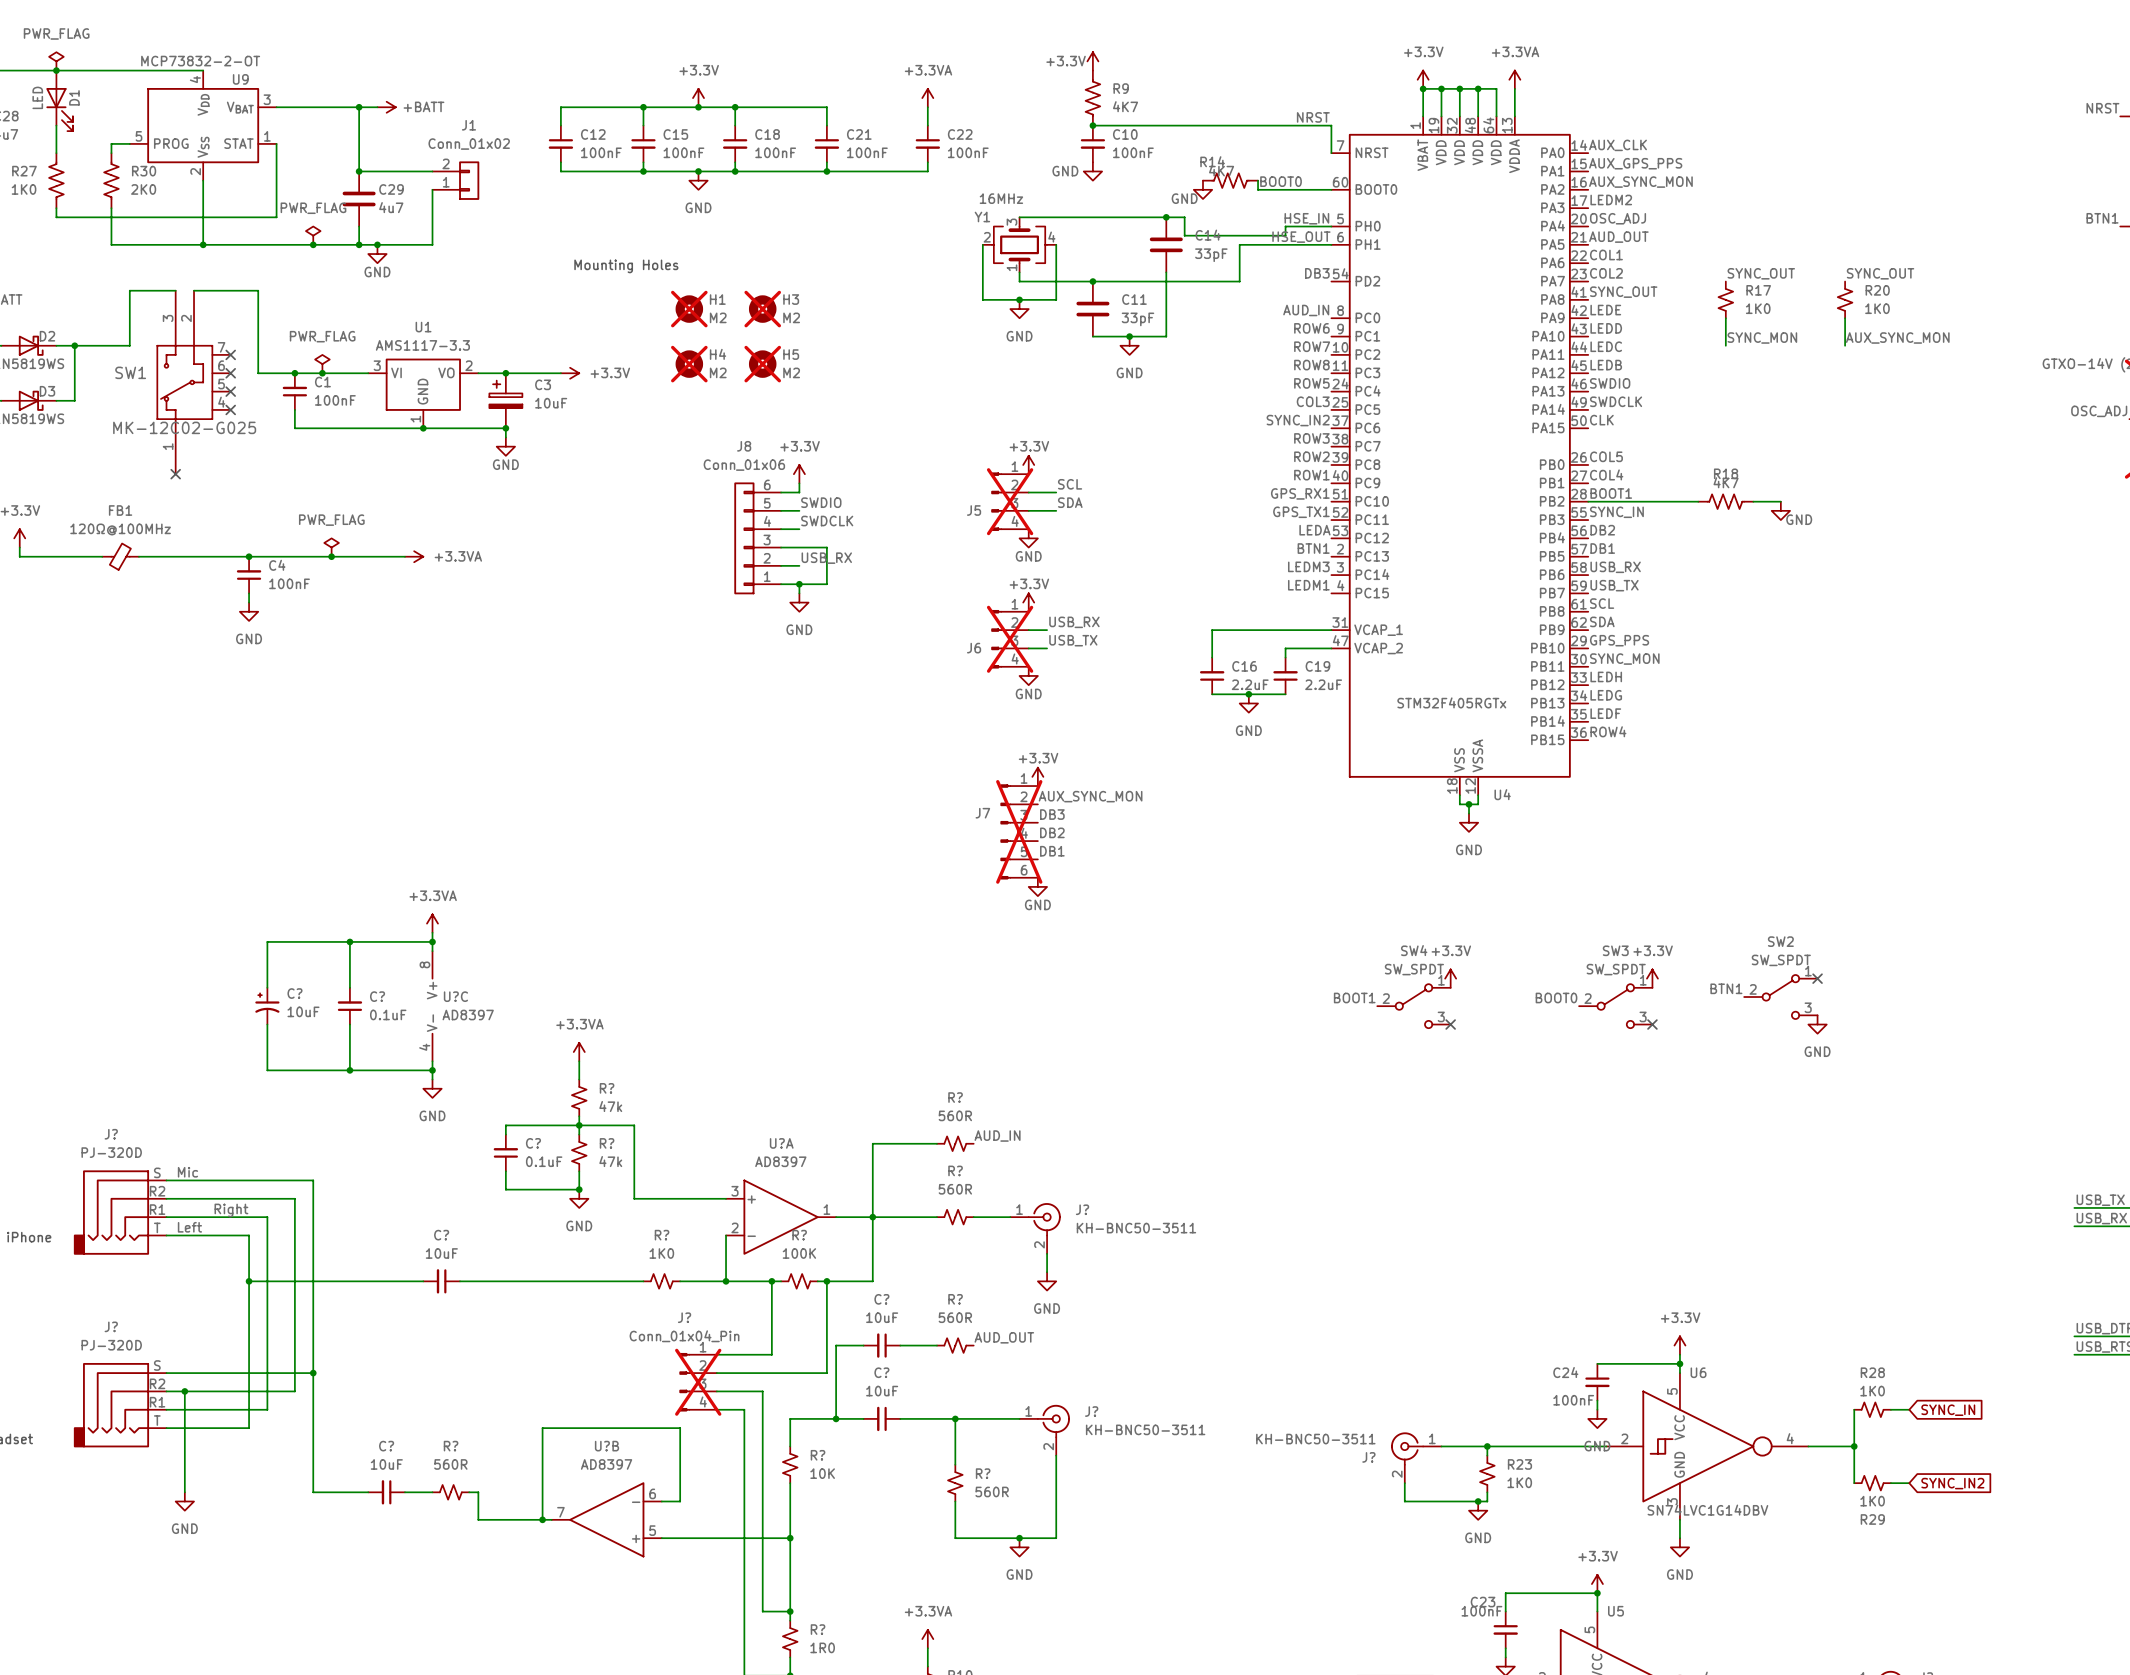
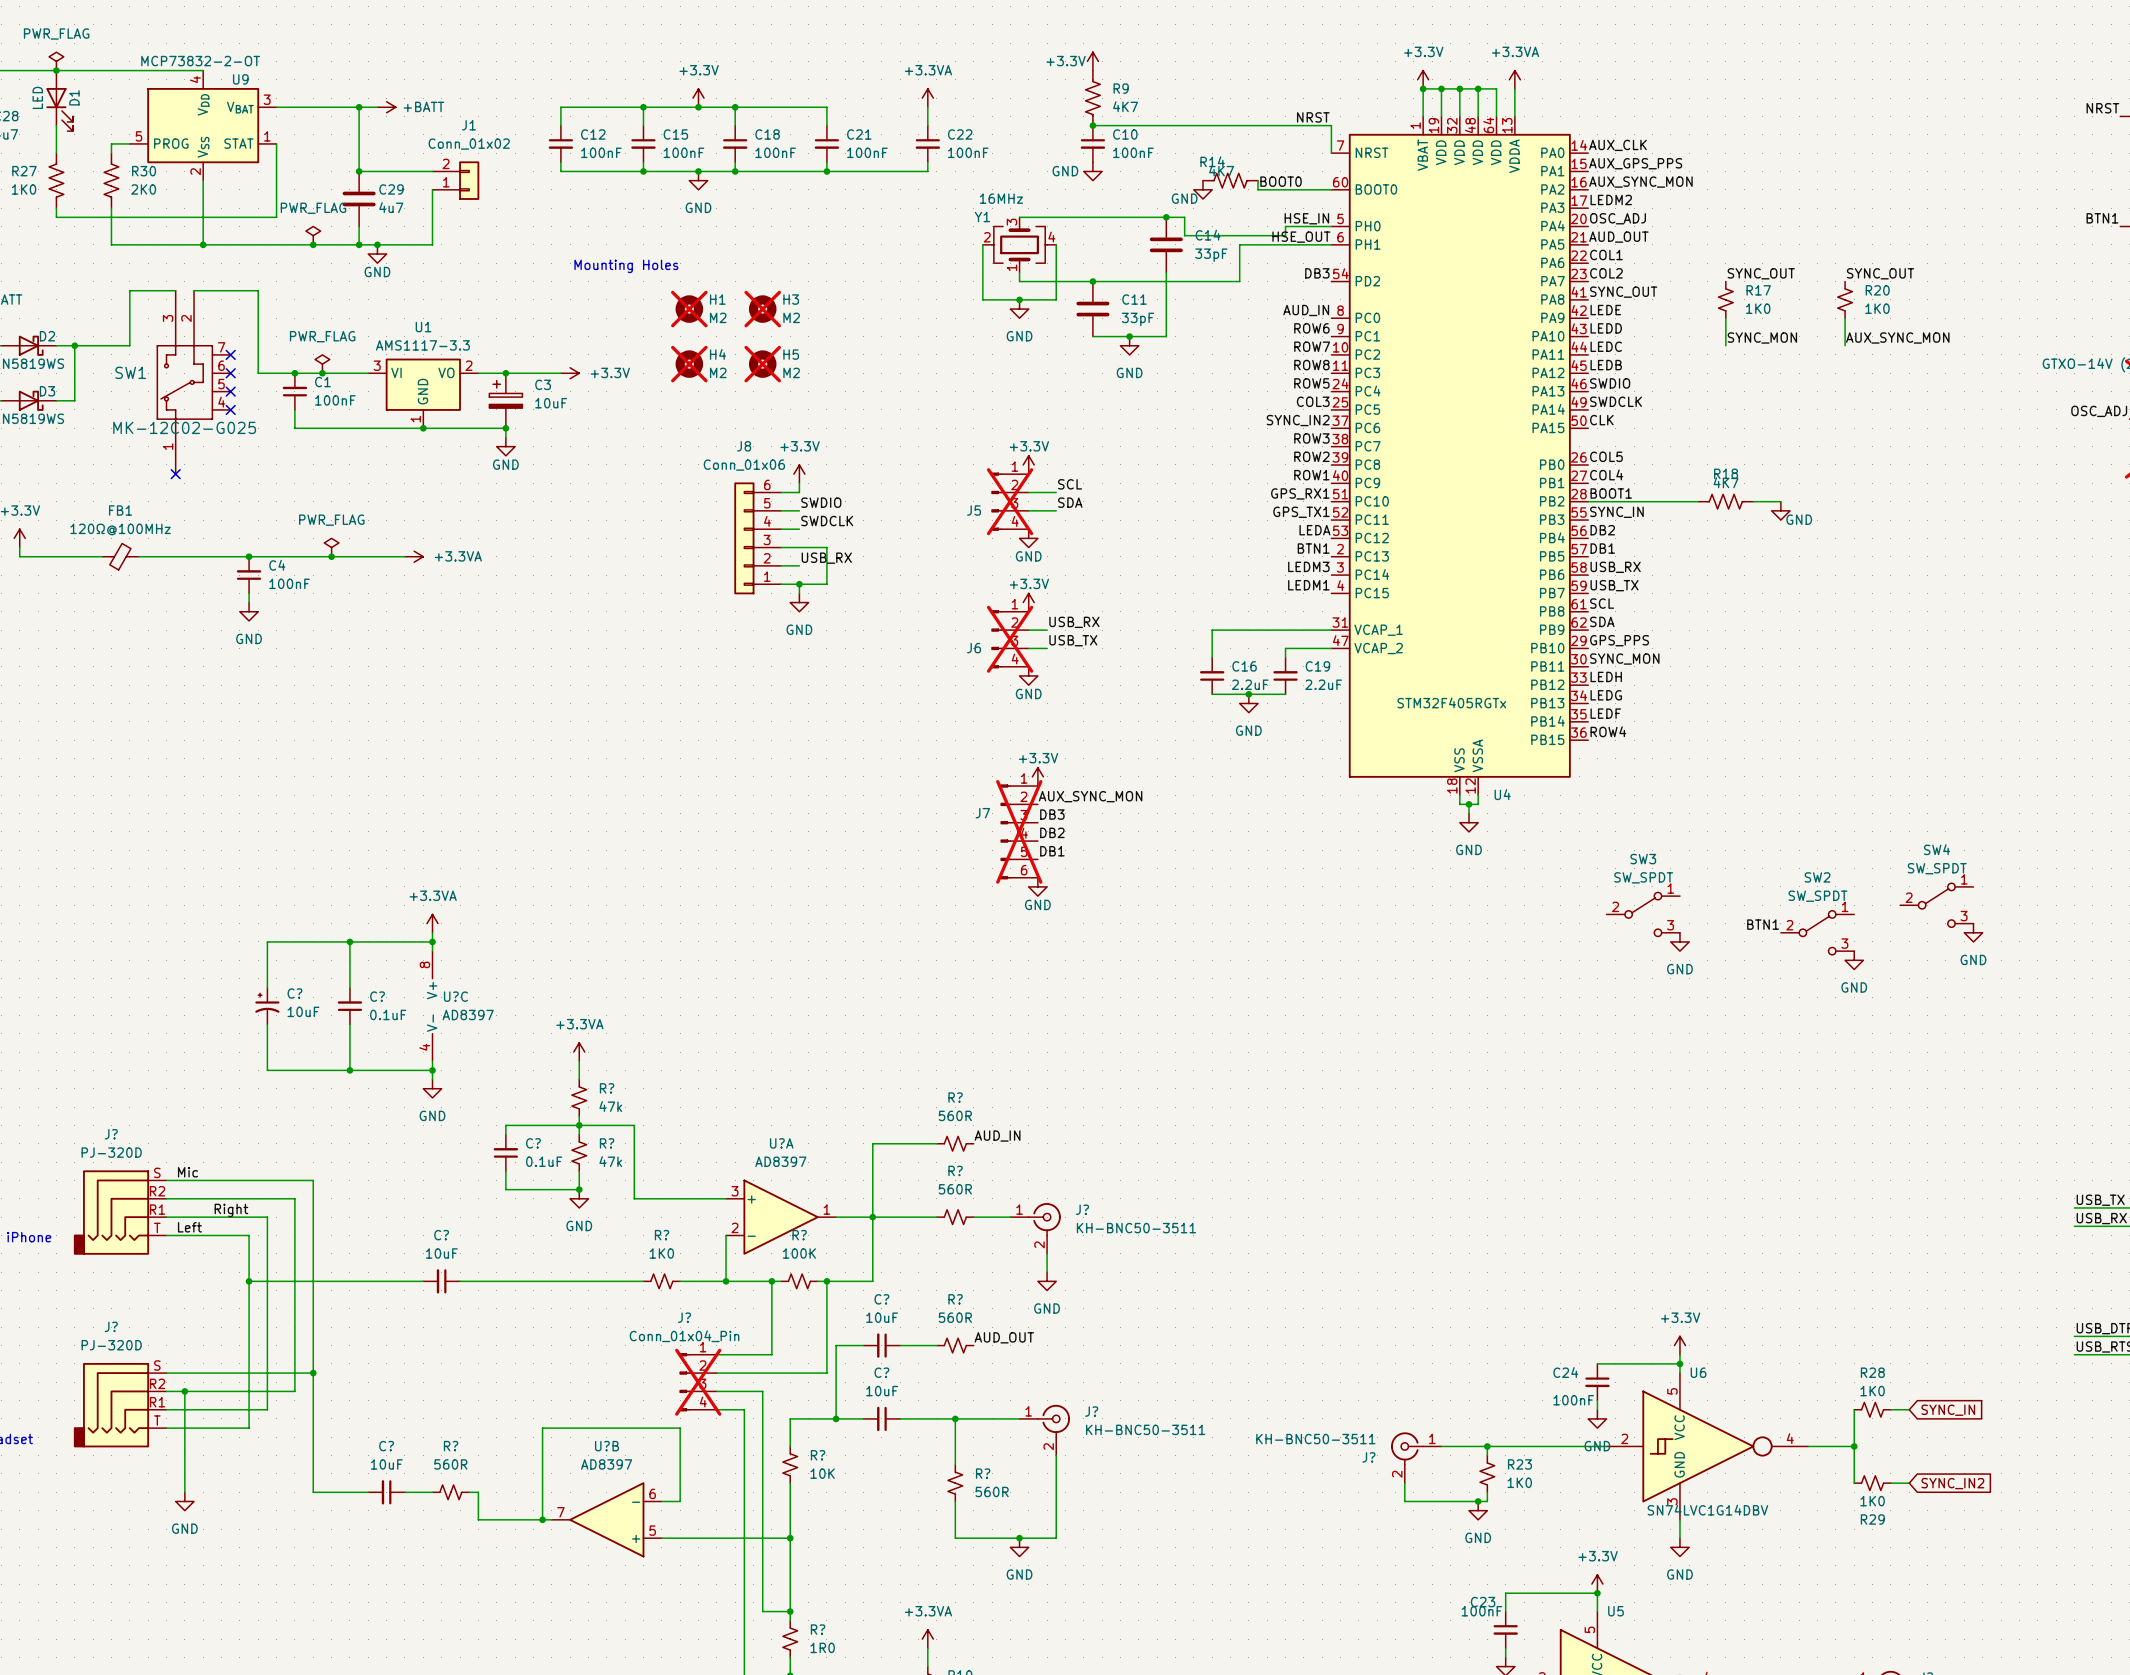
power symbol: none -> GND (1973, 932)
power symbol: none -> GND (1679, 941)
power symbol: +3.3V (1450, 978) -> none
power symbol: +3.3V (1652, 978) -> none
no-connect mark: (1817, 978) -> none
label position: BTN1 (1726, 988) -> BTN1 (1763, 924)
label: BOOT1 (1354, 997) -> none
label: BOOT0 (1556, 997) -> none
SW2 position: (1780, 997) -> (1817, 932)
SW4 position: (1413, 1006) -> (1936, 905)
SW3 position: (1615, 1006) -> (1643, 914)
no-connect mark: (1450, 1024) -> none
no-connect mark: (1652, 1024) -> none
power symbol position: GND (1817, 1024) -> GND (1854, 960)

